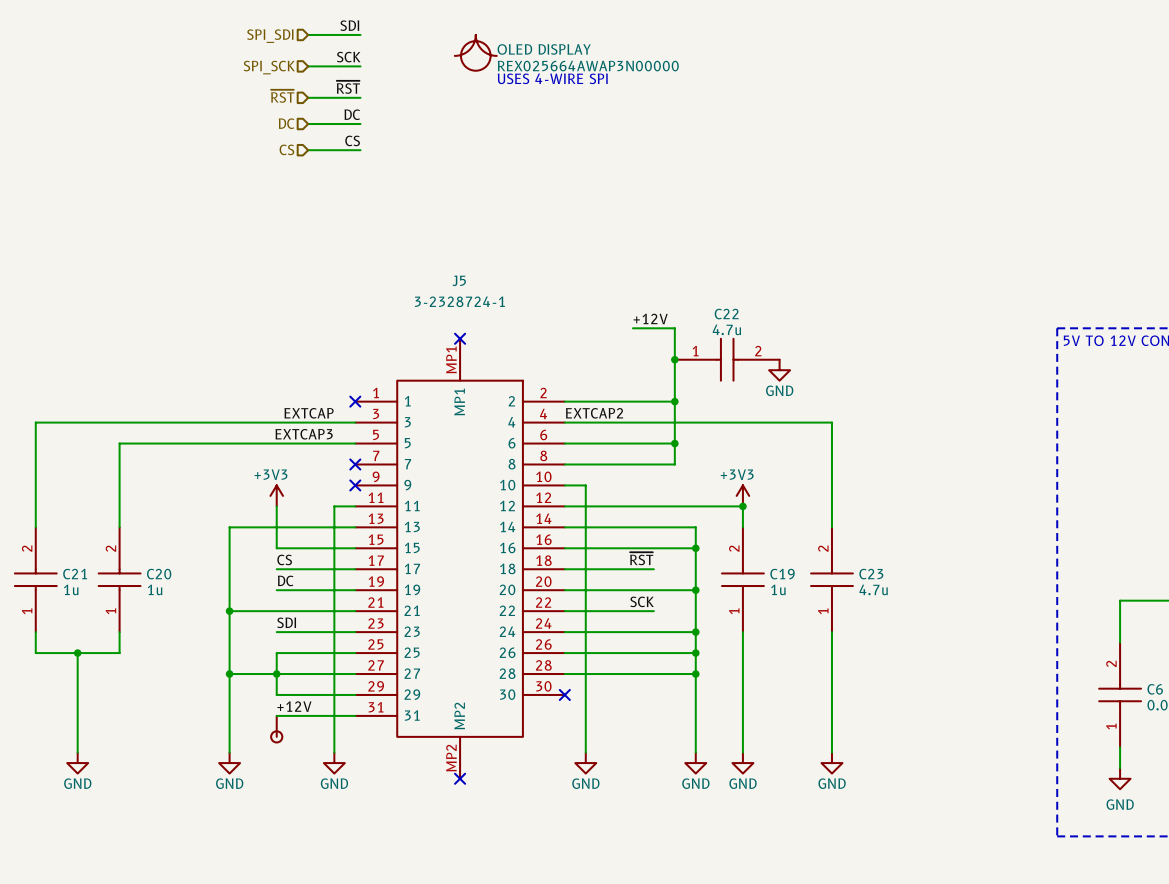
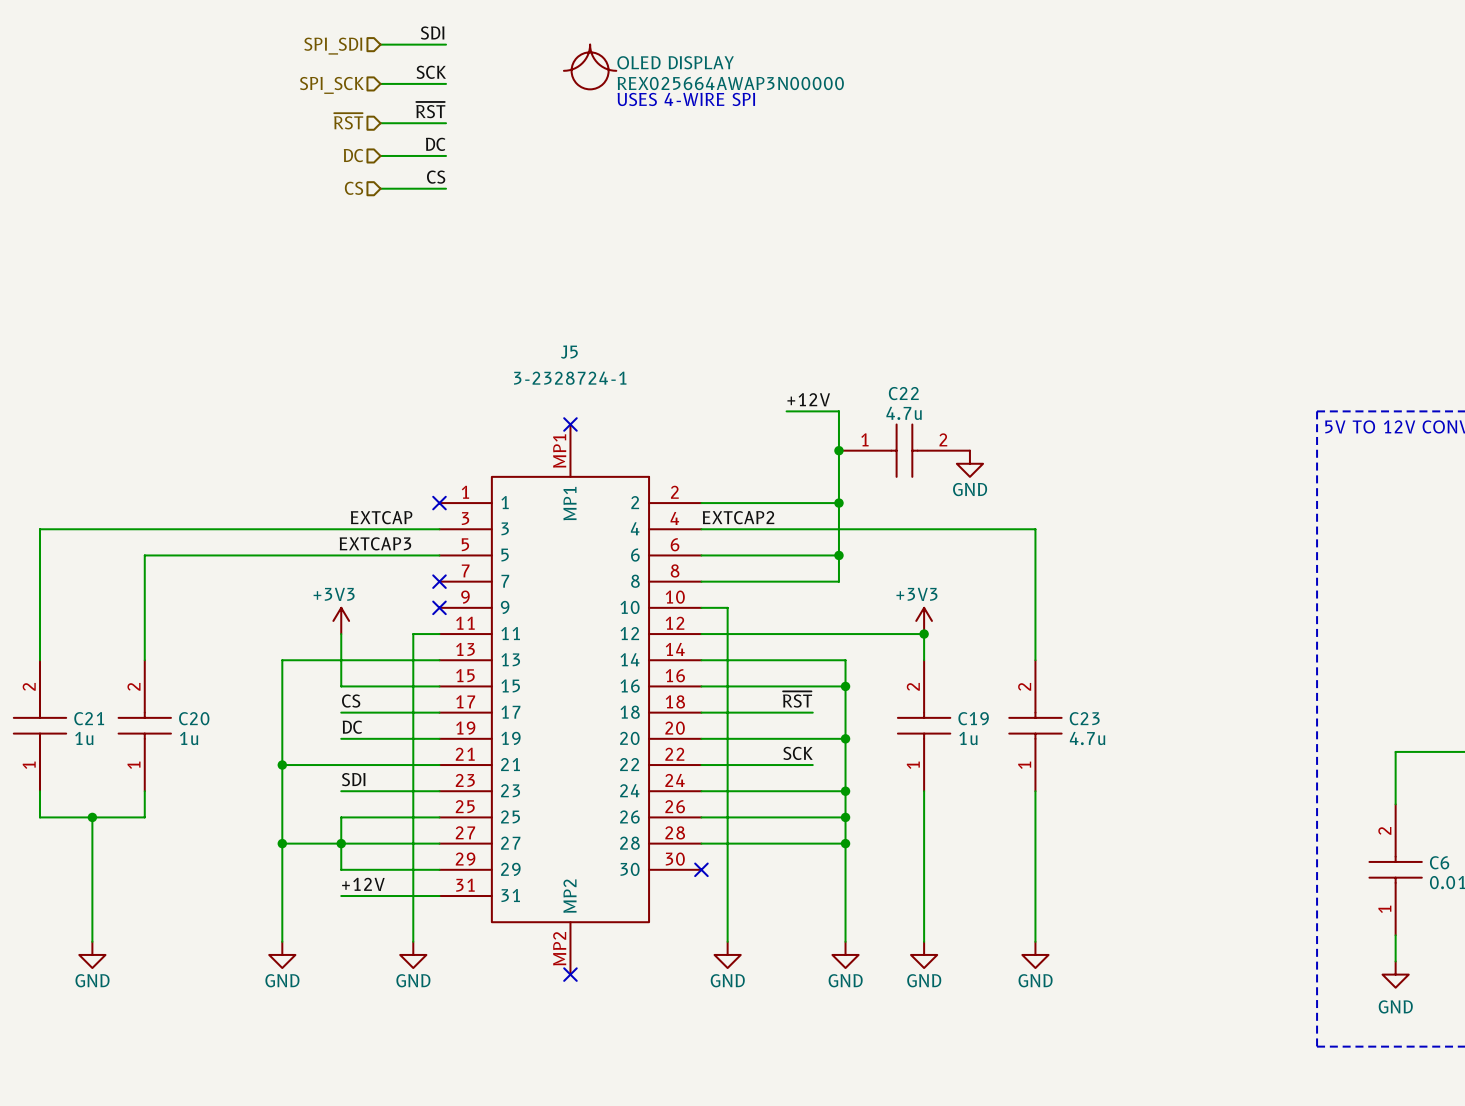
wire: (680, 527) (695, 527) (695, 674) -> (845, 660) (845, 941)
wire: (680, 548) (695, 548) -> none
junction position: (695, 548) -> (845, 686)
wire: (680, 590) (695, 590) -> none
junction position: (695, 590) -> (845, 738)
wire: (680, 632) (695, 632) -> none
junction: none -> (845, 791)
junction: (695, 632) -> none
wire: (680, 653) (695, 653) -> none
junction: none -> (845, 817)
junction: (695, 653) -> none
wire: (680, 674) (695, 674) -> none
junction: none -> (845, 843)
wire: (695, 674) (695, 752) -> none
junction: (695, 674) -> none
part: (276, 729) -> none
power symbol position: GND (695, 763) -> GND (845, 954)

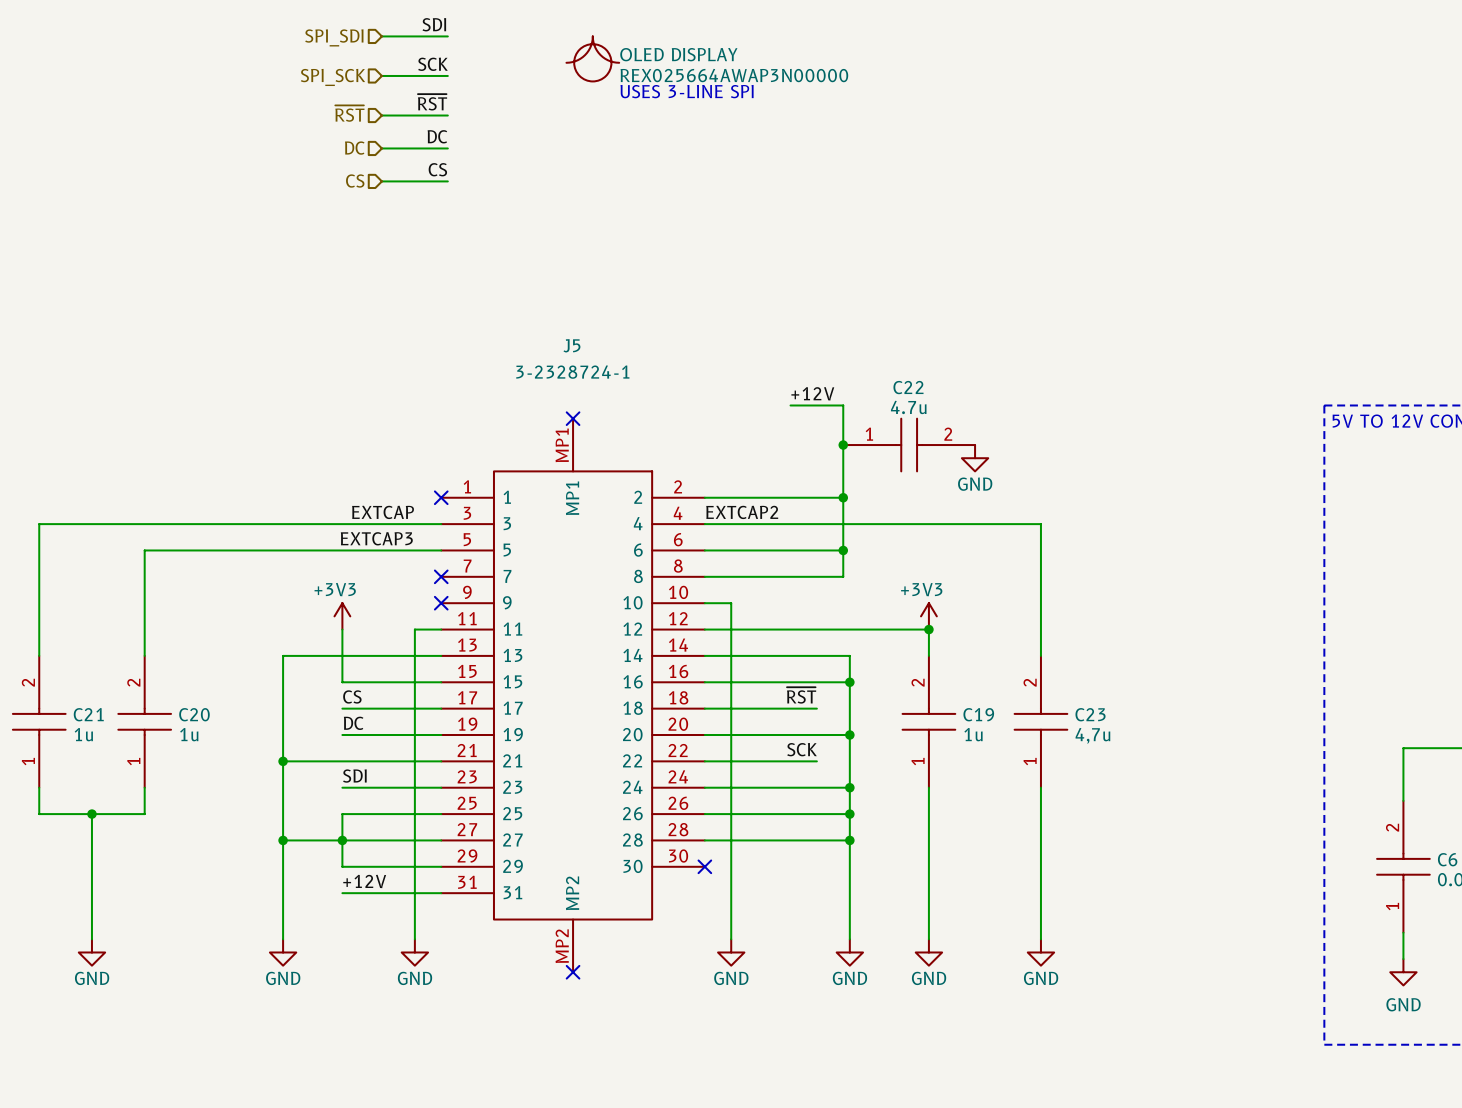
text: USES 4-WIRE SPI (686, 99) -> USES 3-LINE SPI (687, 91)
C23 value: 4.7u (1087, 738) -> 4,7u (1092, 735)

